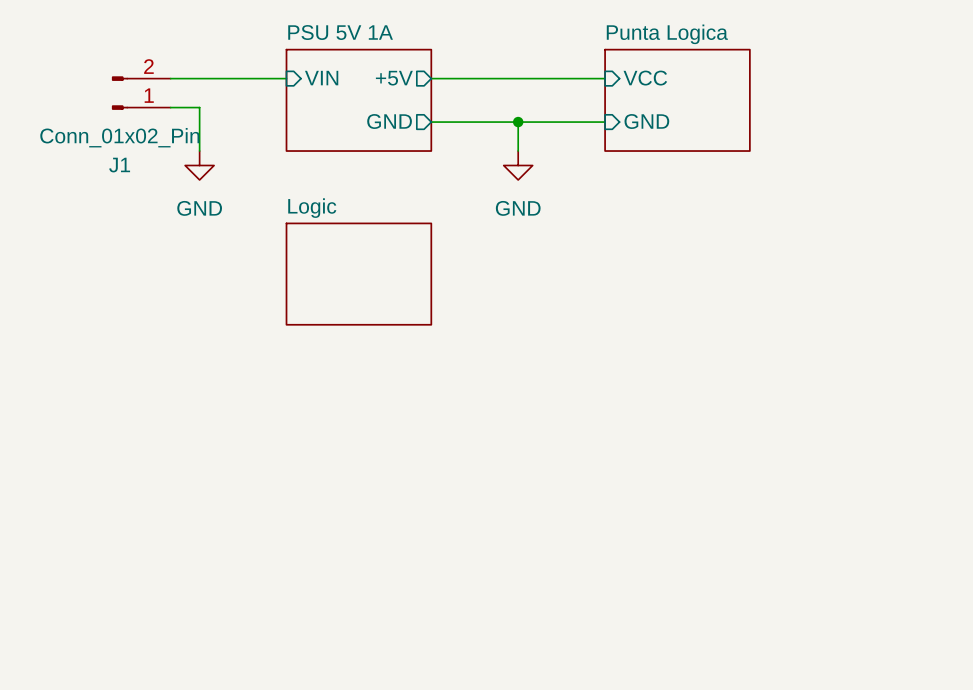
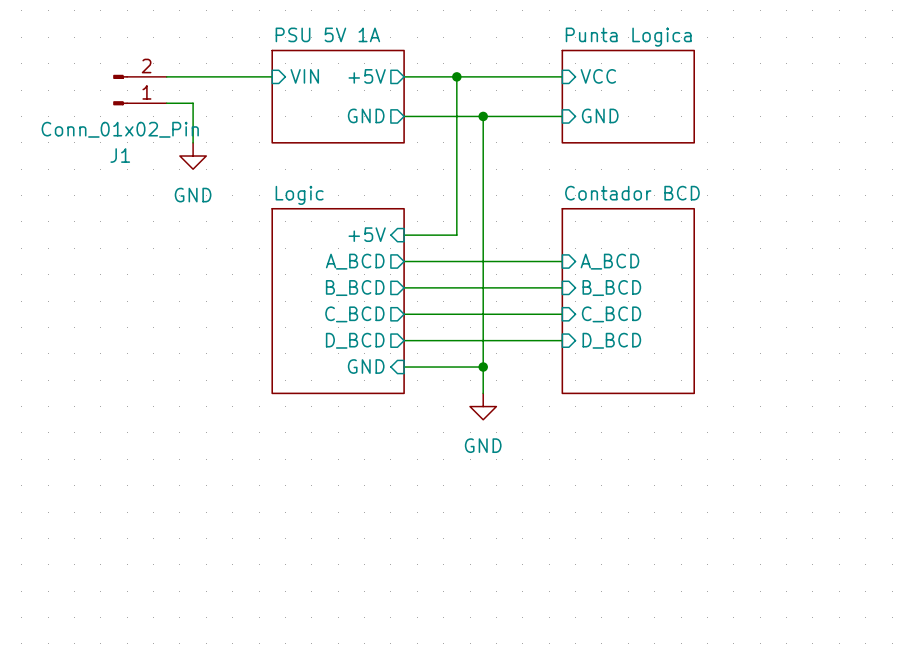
wire: none -> (456, 76) (456, 235) (404, 235)
junction: none -> (456, 76)
wire: none -> (483, 142) (483, 393)
power symbol position: GND (518, 165) -> GND (483, 406)
sheet pin: none -> +5V (367, 234)
sheet Logic: (358, 274) -> none
wire: none -> (404, 261) (562, 261)
sheet pin: none -> A_BCD (355, 261)
sheet pin: none -> A_BCD (609, 261)
wire: none -> (404, 287) (562, 287)
sheet pin: none -> B_BCD (355, 288)
sheet pin: none -> B_BCD (611, 288)
sheet Logic: none -> (338, 301)
sheet Contador BCD: none -> (628, 301)
wire: none -> (404, 314) (562, 314)
sheet pin: none -> C_BCD (354, 314)
sheet pin: none -> C_BCD (611, 314)
wire: none -> (404, 340) (562, 340)
sheet pin: none -> D_BCD (355, 340)
sheet pin: none -> D_BCD (611, 340)
sheet pin: none -> GND (366, 366)
wire: none -> (404, 367) (483, 367)
junction: none -> (483, 367)

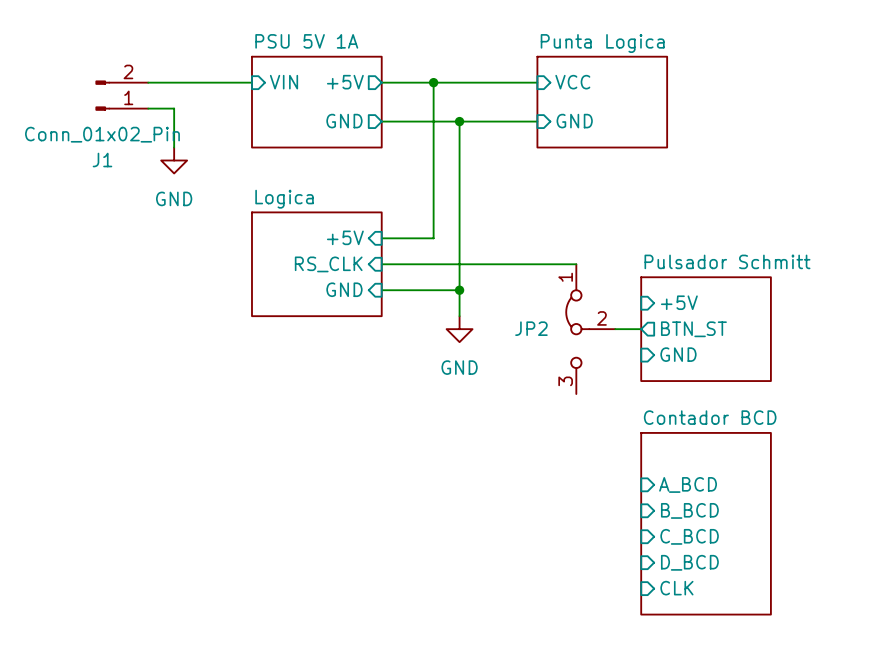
sheet Logica: none -> (316, 264)
sheet pin shape: output (355, 261) -> input (328, 264)
sheet pin: A_BCD (355, 261) -> RS_CLK (328, 264)
wire: none -> (537, 264) (576, 264)
sheet pin position: A_BCD (609, 261) -> A_BCD (688, 484)
wire: (483, 287) (562, 287) -> none
junction: none -> (459, 290)
sheet pin shape: output (355, 288) -> input (344, 289)
sheet pin: B_BCD (355, 288) -> GND (344, 289)
sheet pin position: B_BCD (611, 288) -> B_BCD (689, 510)
sheet pin: none -> +5V (679, 302)
sheet Logic: (338, 301) -> none
sheet Contador BCD position: (628, 301) -> (706, 523)
sheet pin: C_BCD (354, 314) -> none
wire: (404, 314) (562, 314) -> none
wire: (483, 314) (483, 393) -> none
sheet pin: C_BCD (611, 314) -> none
JP2: none -> (590, 329)
wire: none -> (615, 329) (641, 329)
sheet pin: none -> BTN_ST (693, 329)
sheet Pulsador Schmitt: none -> (706, 329)
sheet pin: D_BCD (355, 340) -> none
wire: (404, 340) (562, 340) -> none
sheet pin: D_BCD (611, 340) -> none
sheet pin: none -> GND (678, 354)
sheet pin: GND (366, 366) -> none
wire: (404, 367) (483, 367) -> none
junction: (483, 367) -> none
power symbol position: GND (483, 406) -> GND (459, 329)
sheet pin: none -> C_BCD (689, 536)
sheet pin: none -> D_BCD (689, 562)
sheet pin: none -> CLK (676, 588)

